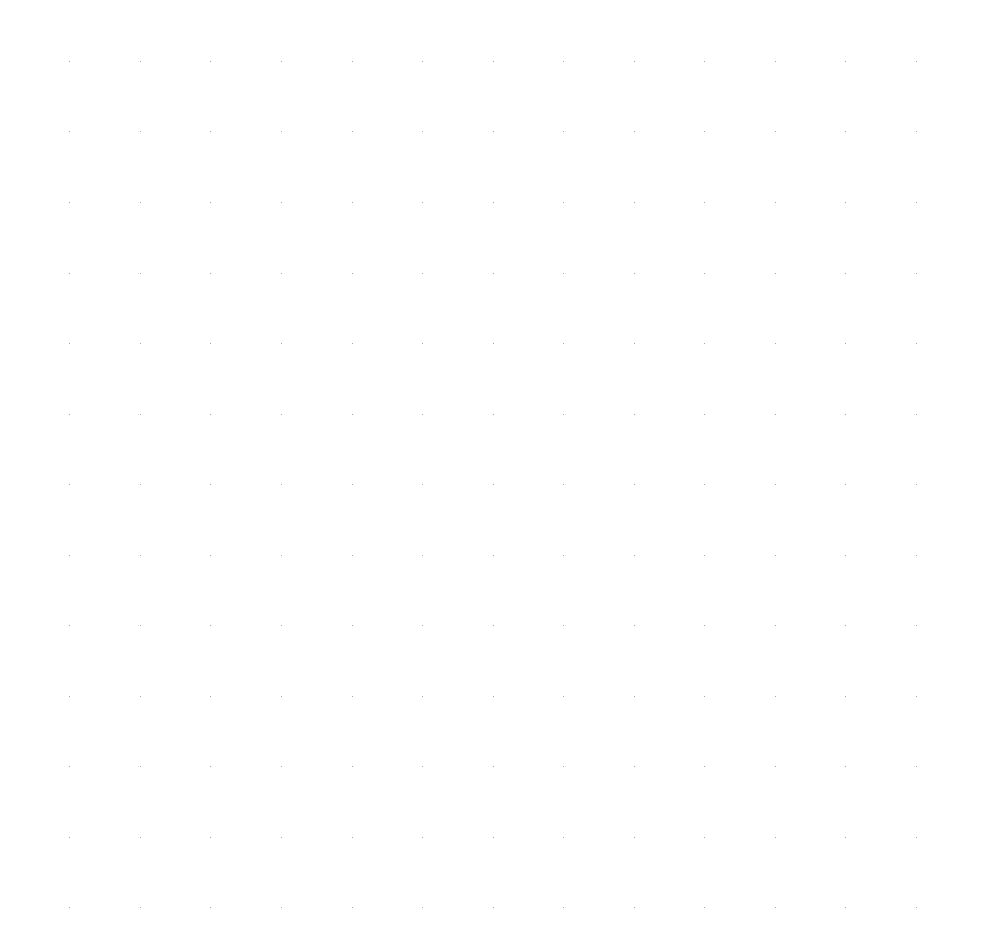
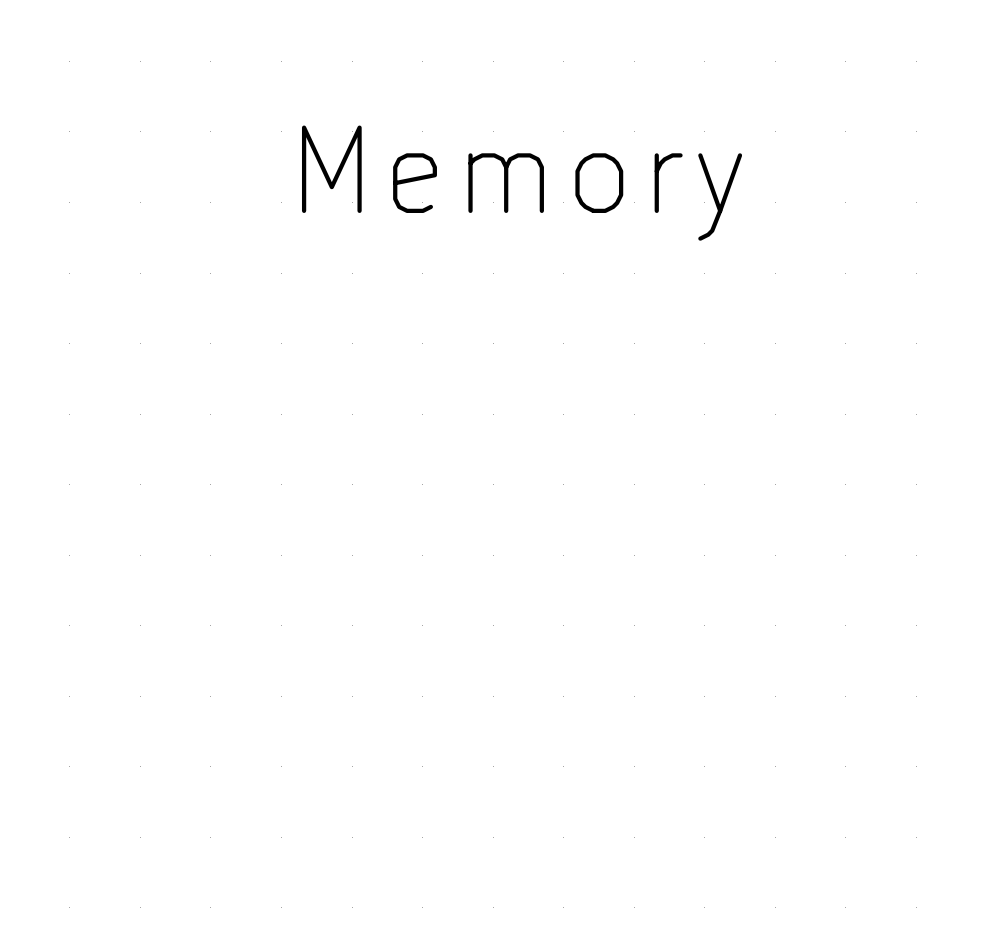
label: none -> Memory (522, 183)

